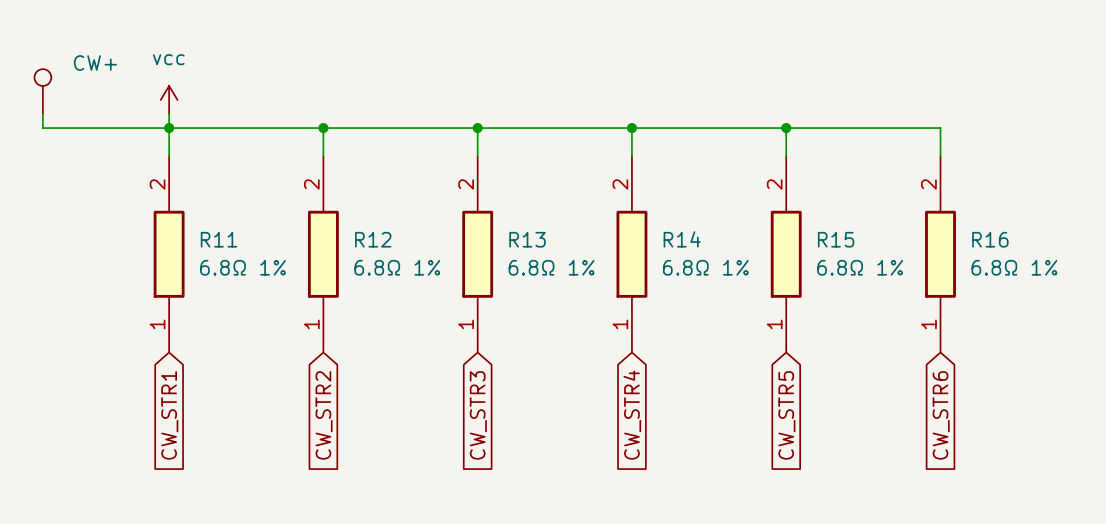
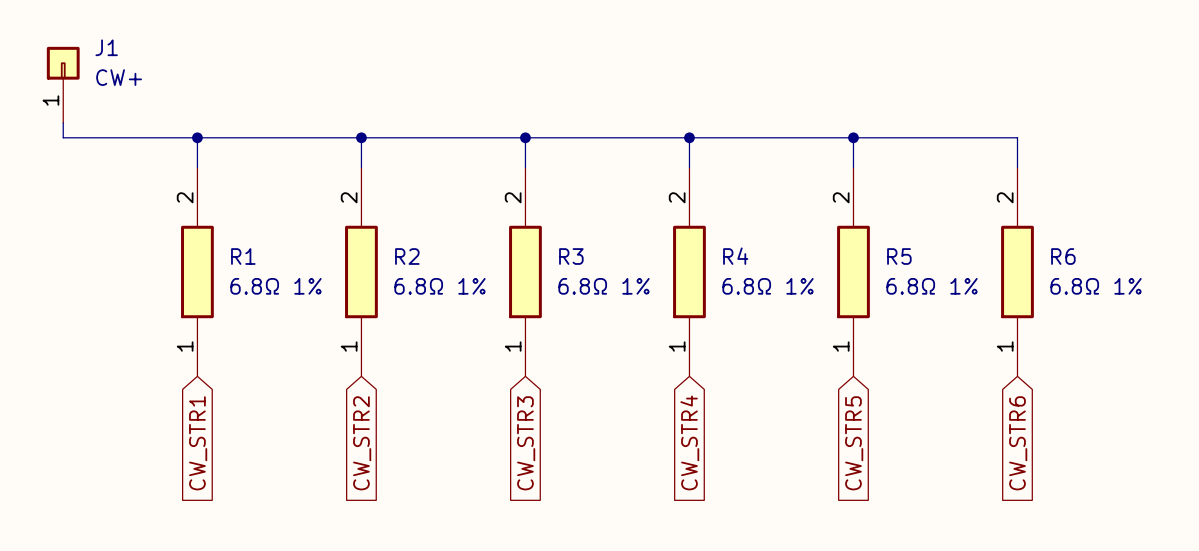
J1: none -> CW+ (63, 84)
CW+: (42, 91) -> none
power symbol: vcc (169, 99) -> none
wire: (169, 114) (169, 128) -> none
R11 name: R11 (218, 239) -> R1 (243, 256)
R12 name: R12 (373, 239) -> R2 (407, 256)
R13 name: R13 (527, 239) -> R3 (571, 256)
R14 name: R14 (682, 239) -> R4 (735, 256)
R15 name: R15 (836, 239) -> R5 (899, 256)
R16 name: R16 (990, 239) -> R6 (1063, 256)

